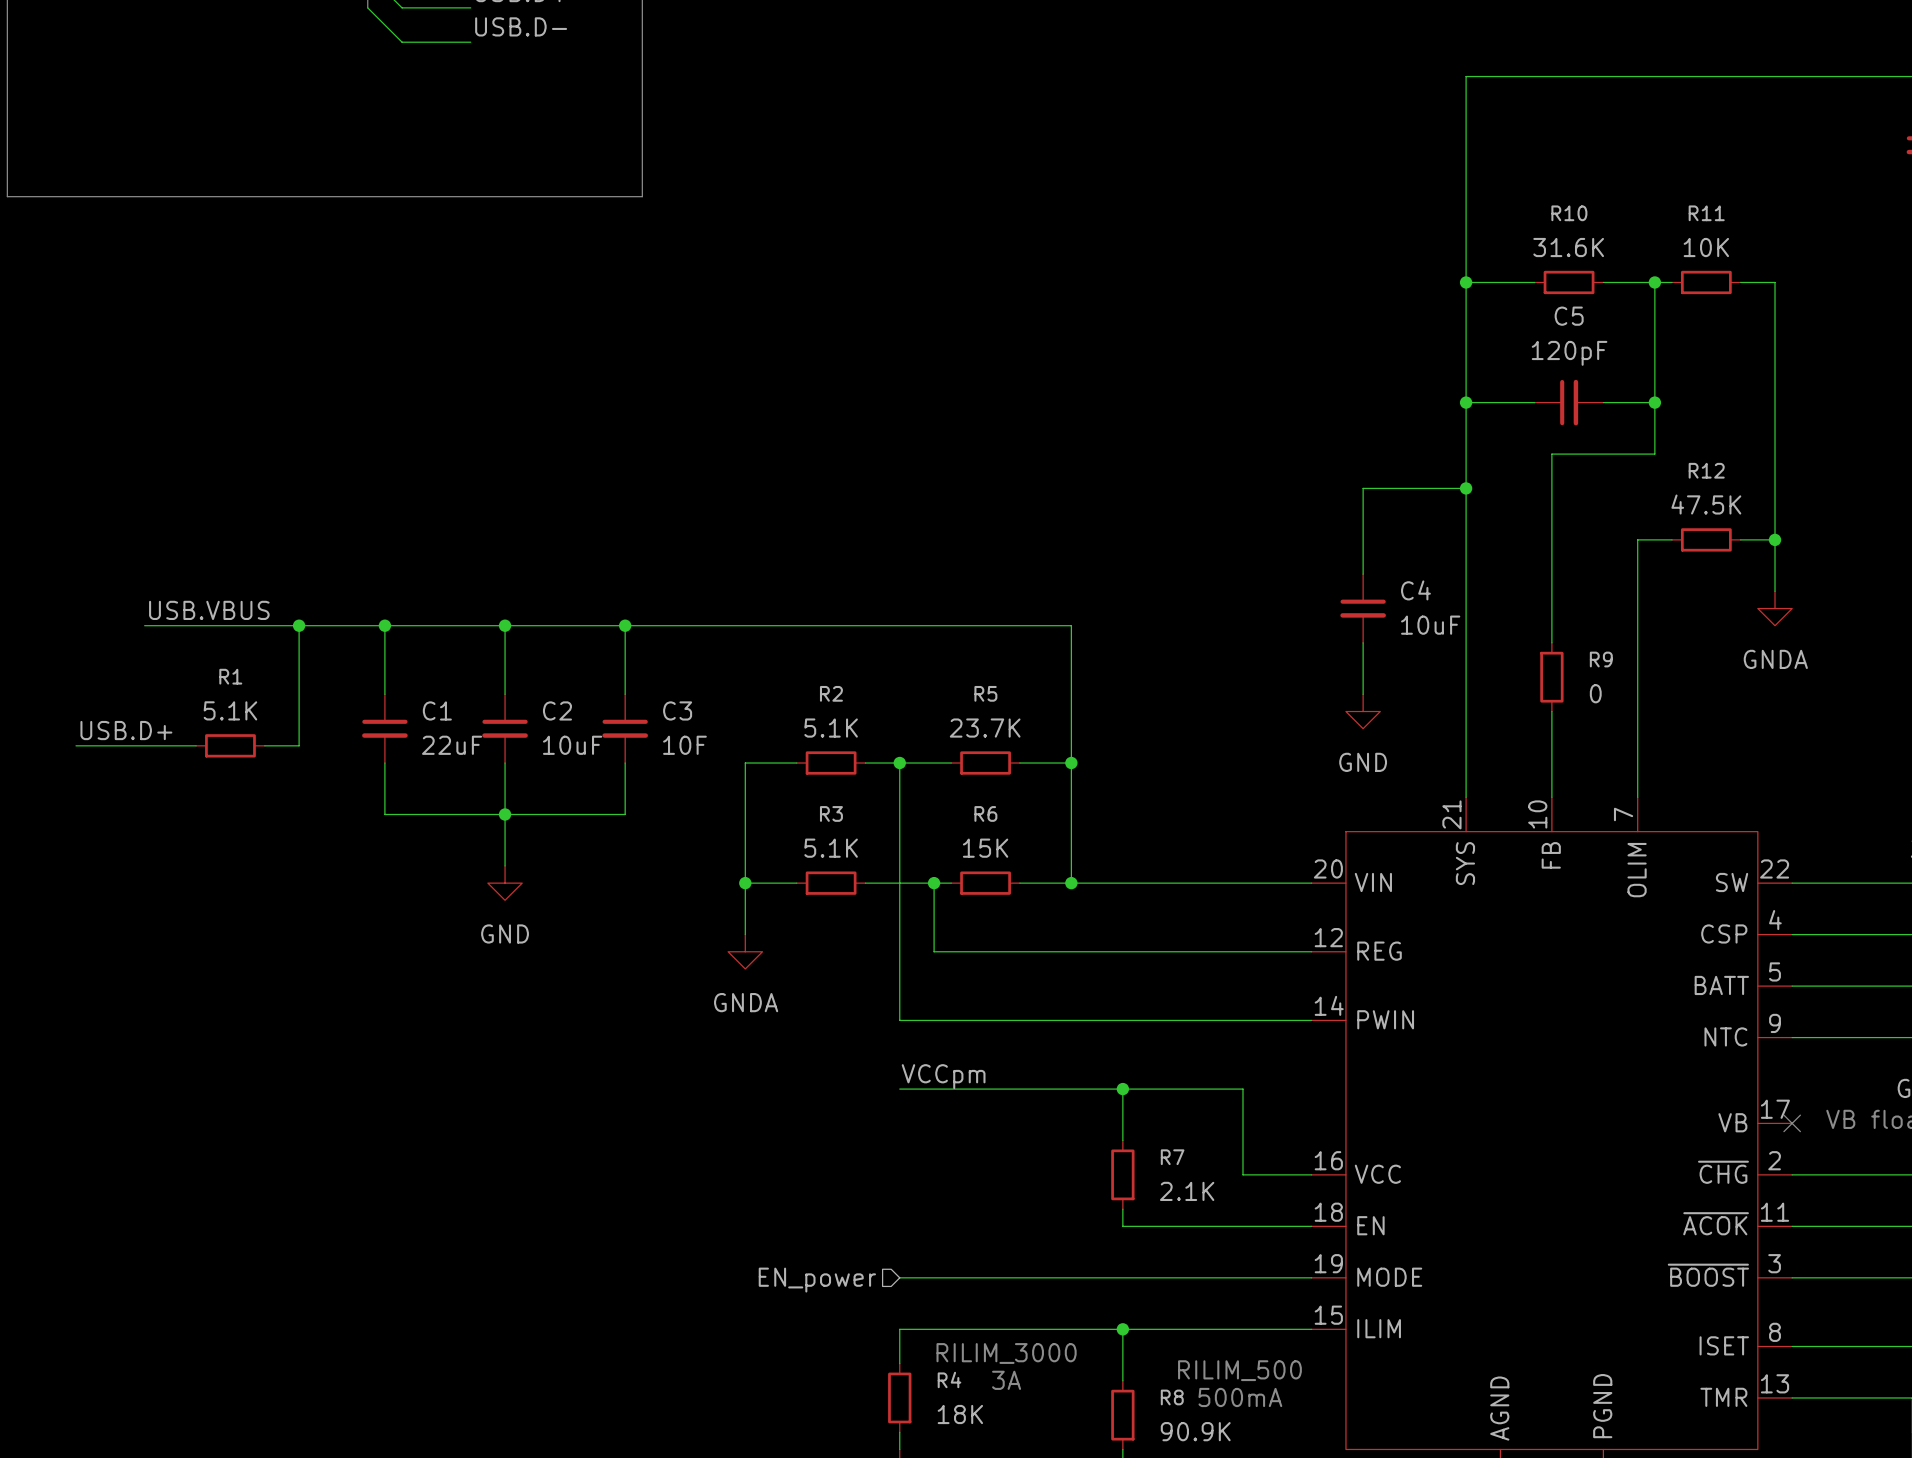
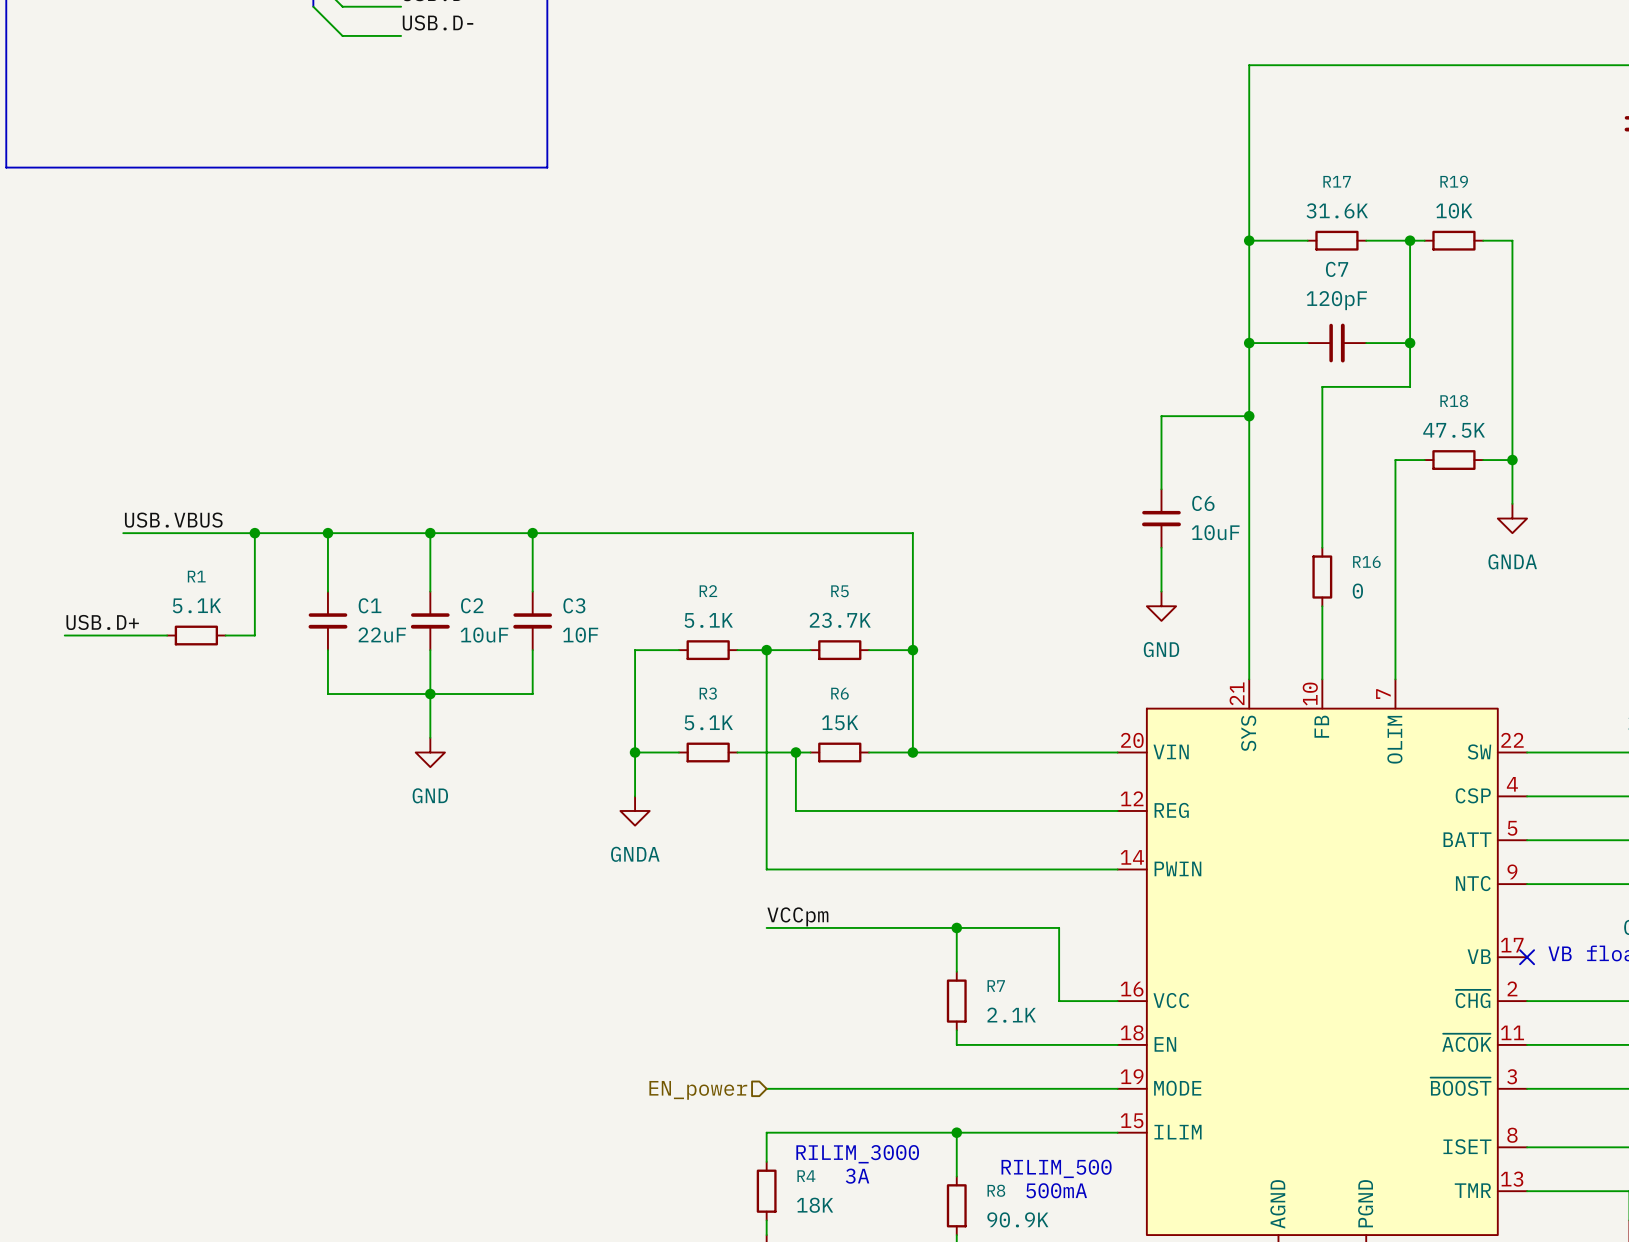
R10 name: R10 (1569, 213) -> R17 (1337, 181)
R11 name: R11 (1706, 213) -> R19 (1454, 181)
C5 name: C5 (1569, 316) -> C7 (1337, 269)
R12 name: R12 (1706, 470) -> R18 (1454, 401)
C4 name: C4 (1415, 590) -> C6 (1203, 503)
R9 name: R9 (1601, 659) -> R16 (1366, 562)

